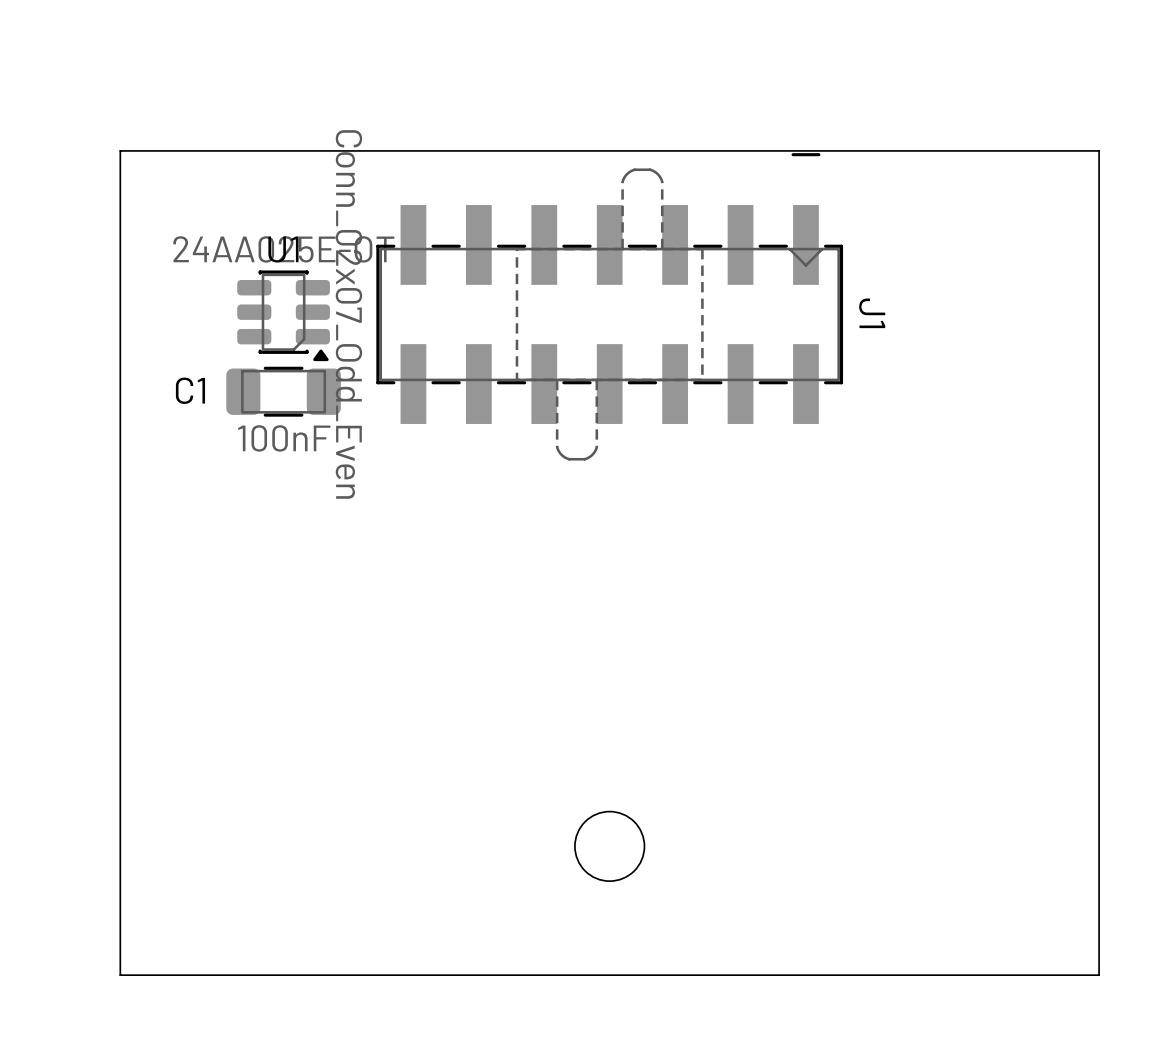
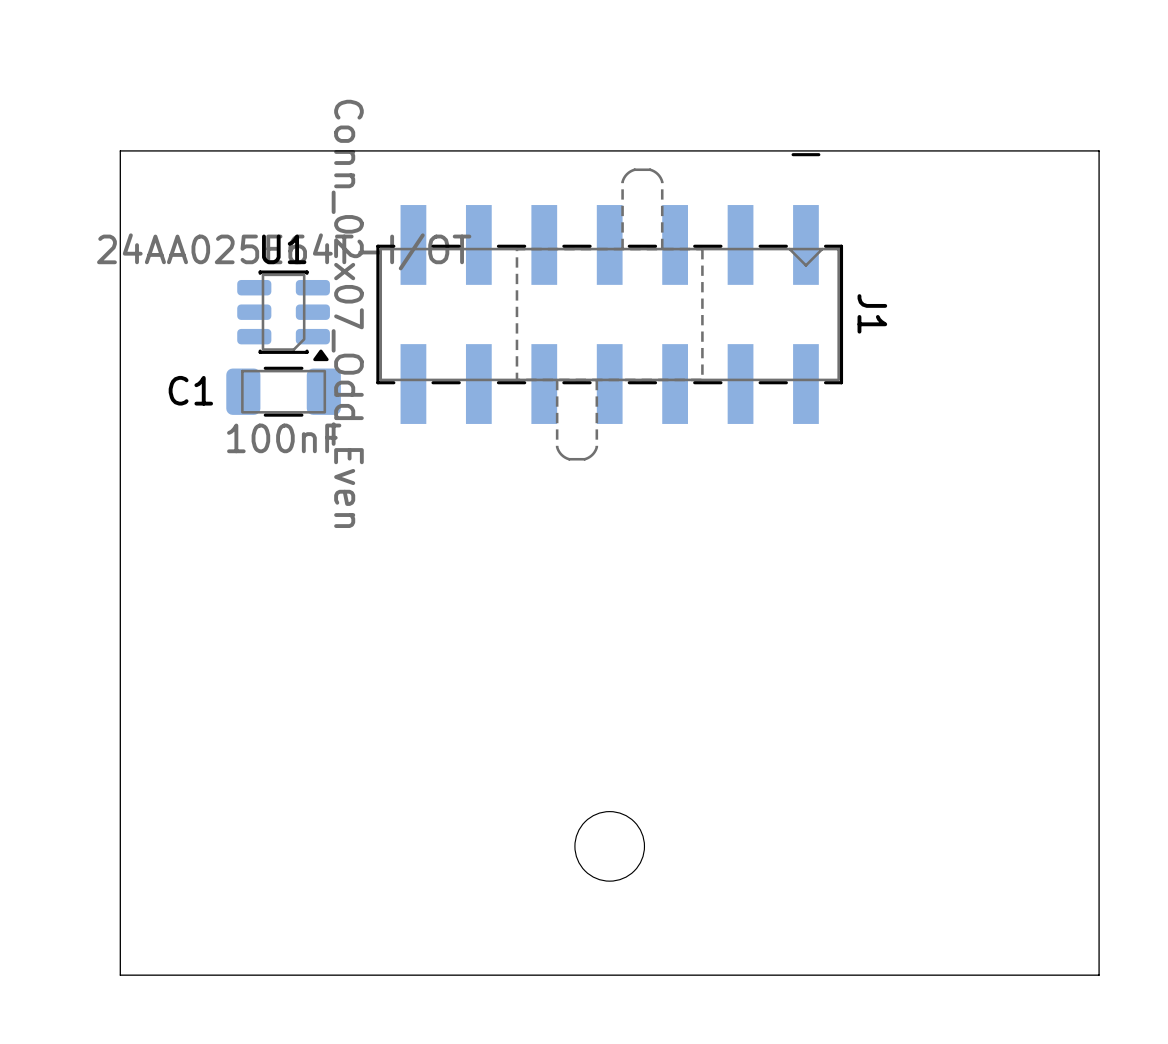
U1 value: 24AA025E-OT (283, 249) -> 24AA025E64T-I/OT (284, 251)

